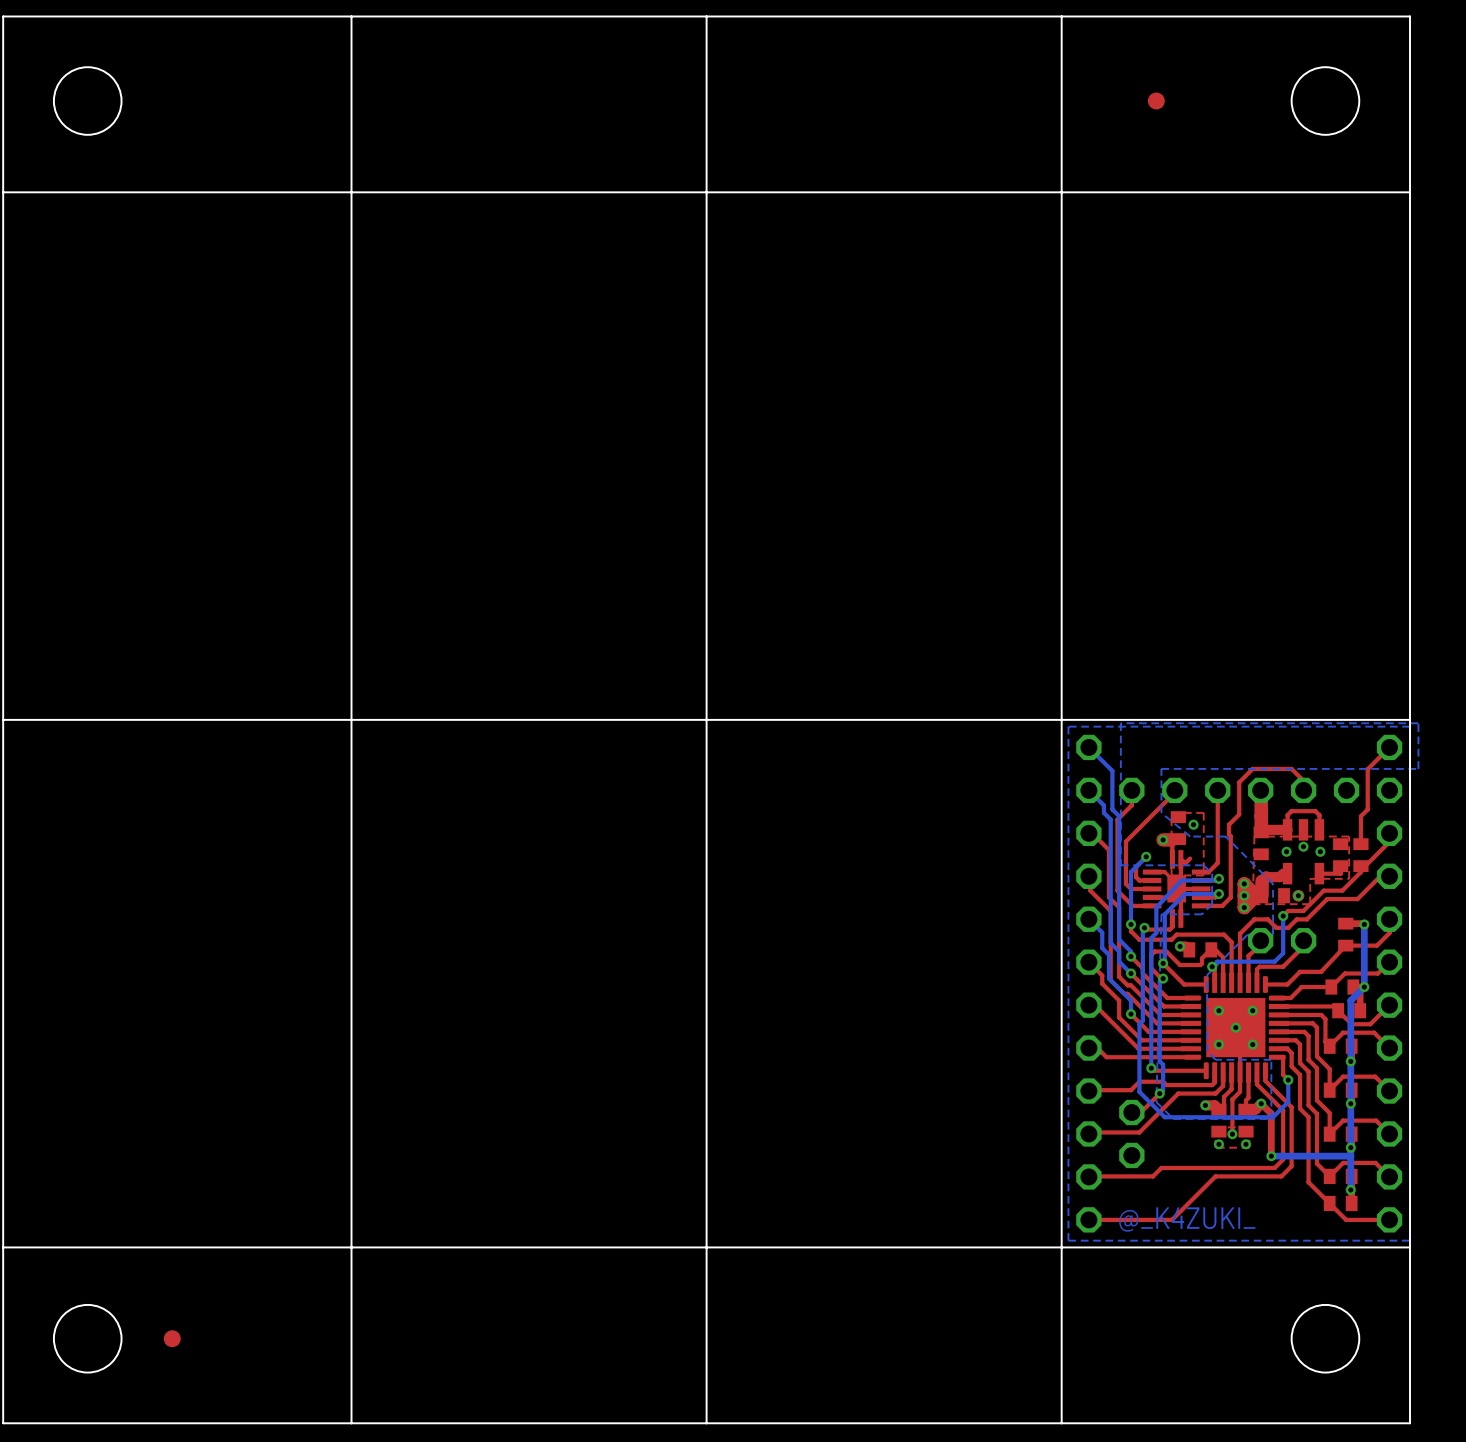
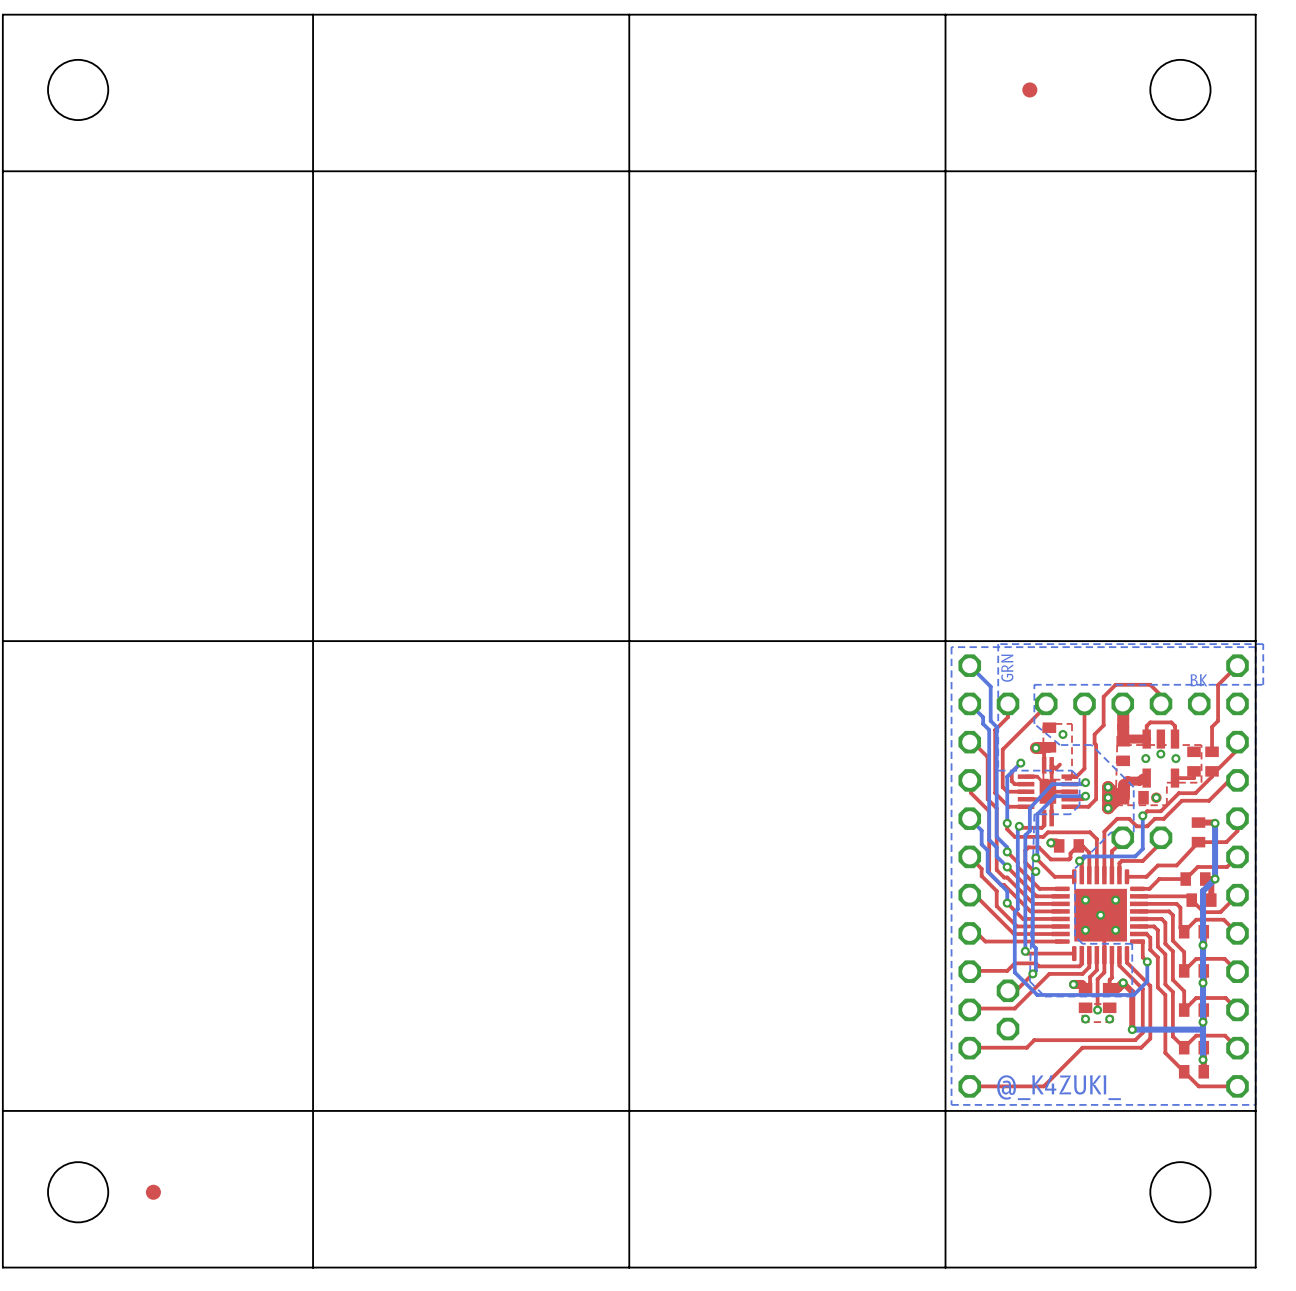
text: none -> GRN (1007, 668)
text: none -> BK (1198, 680)

